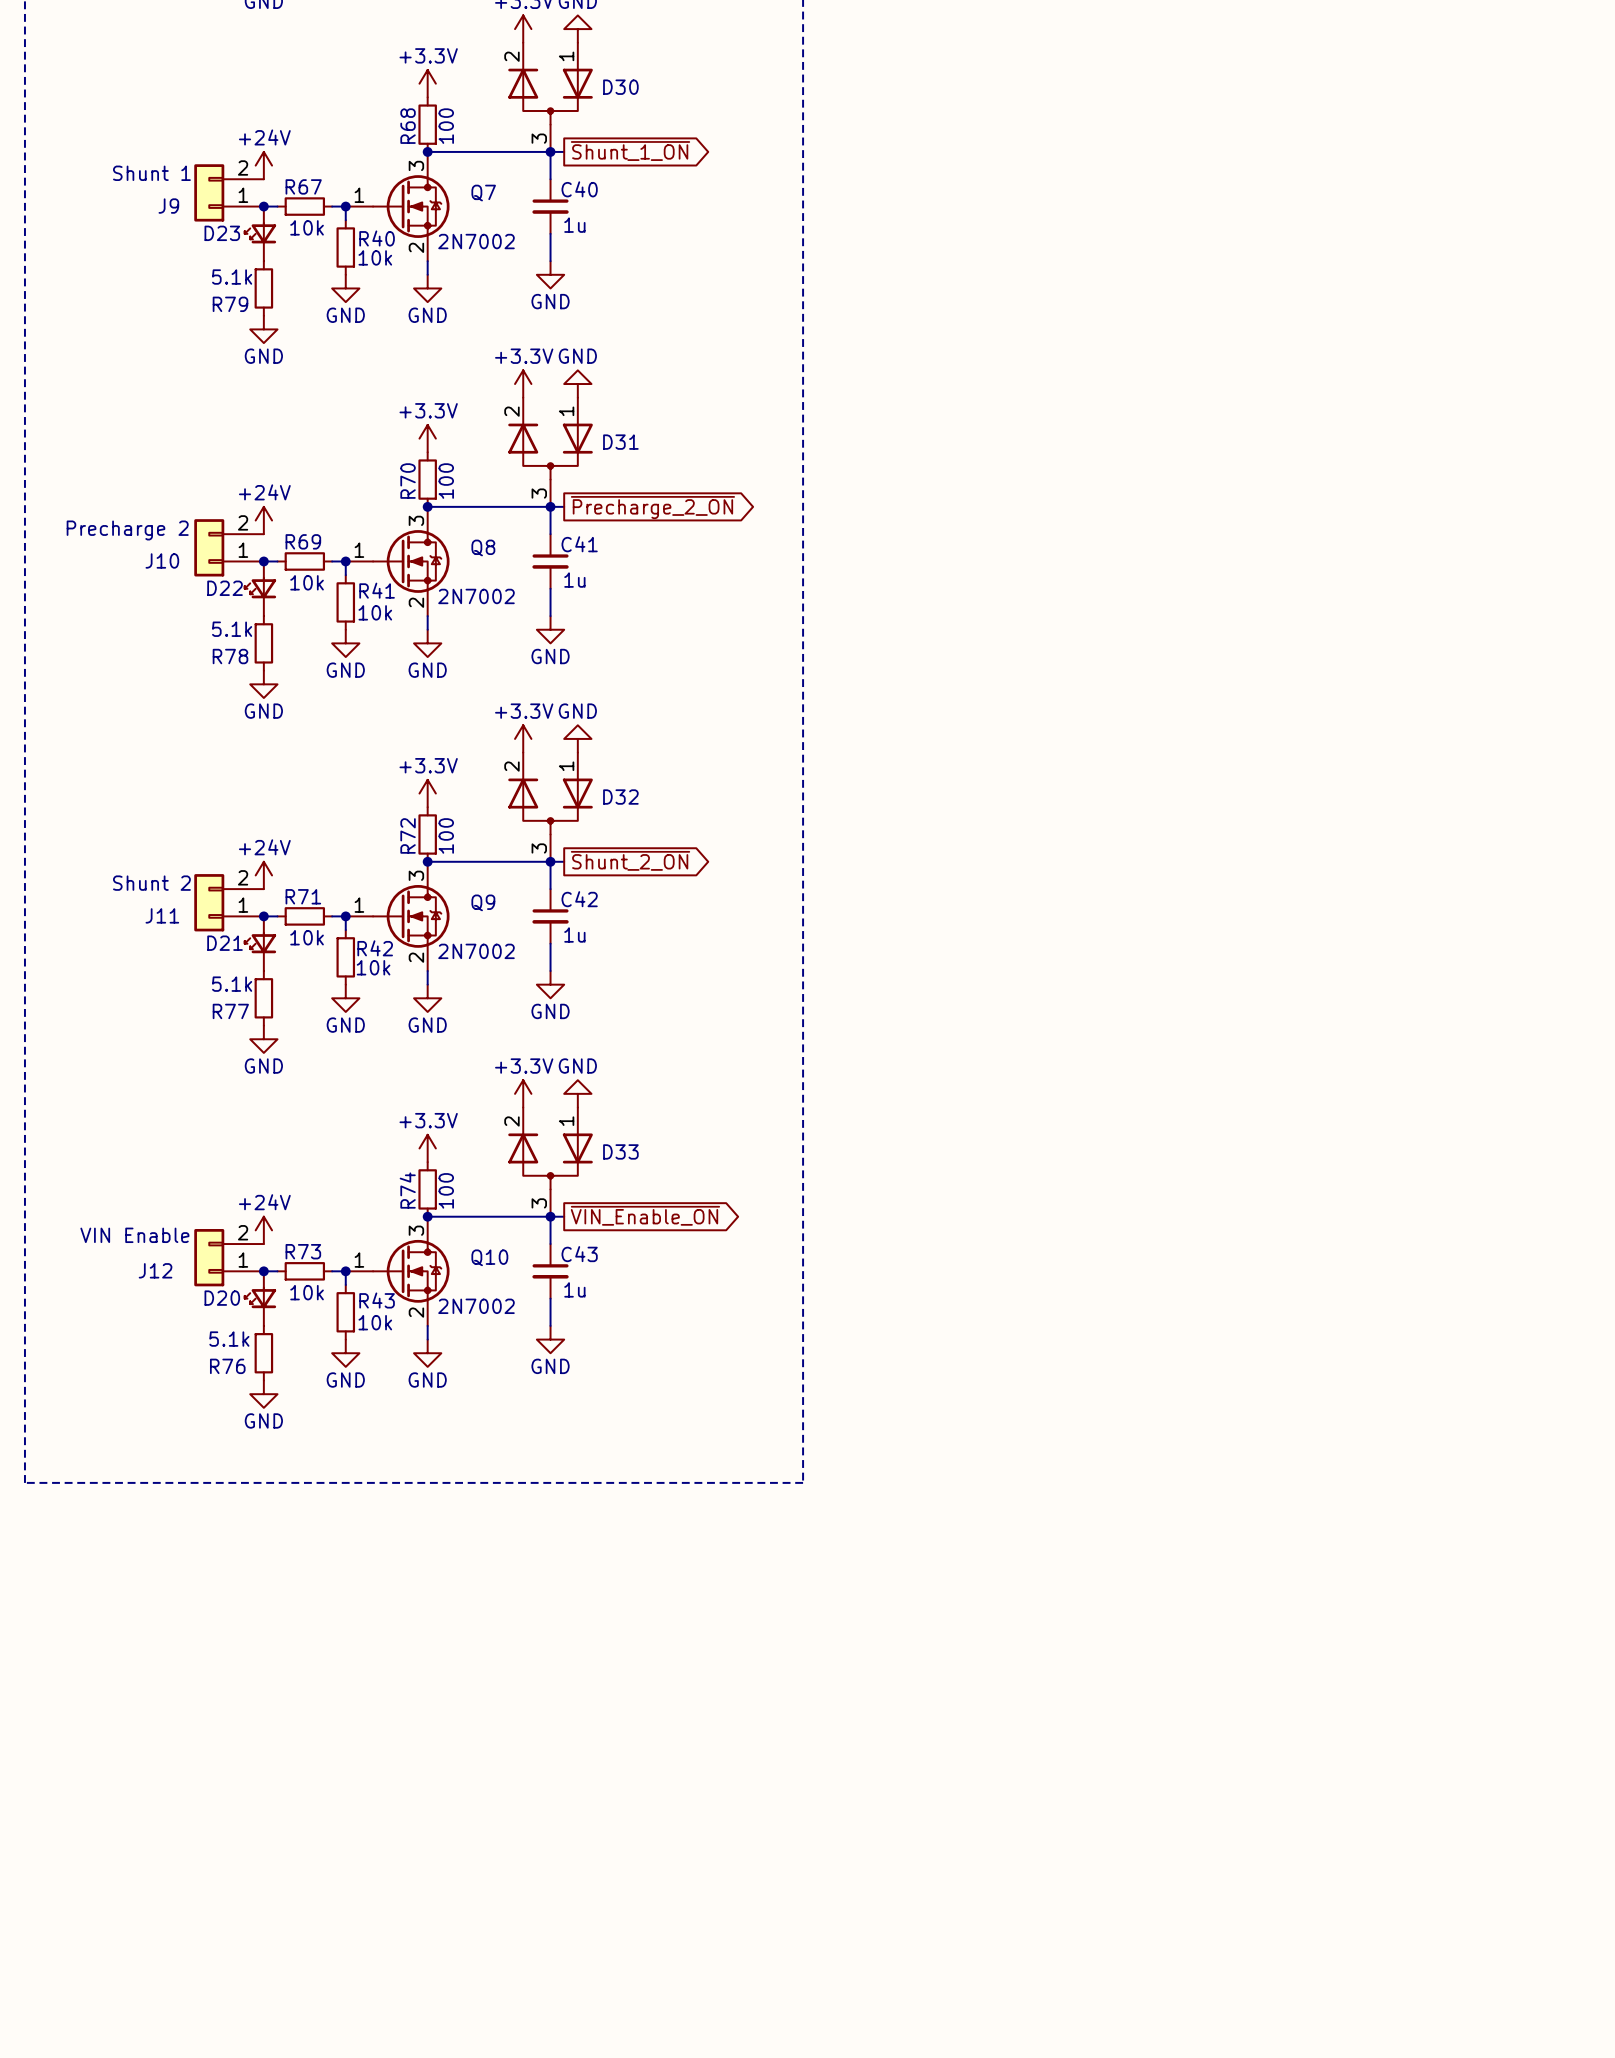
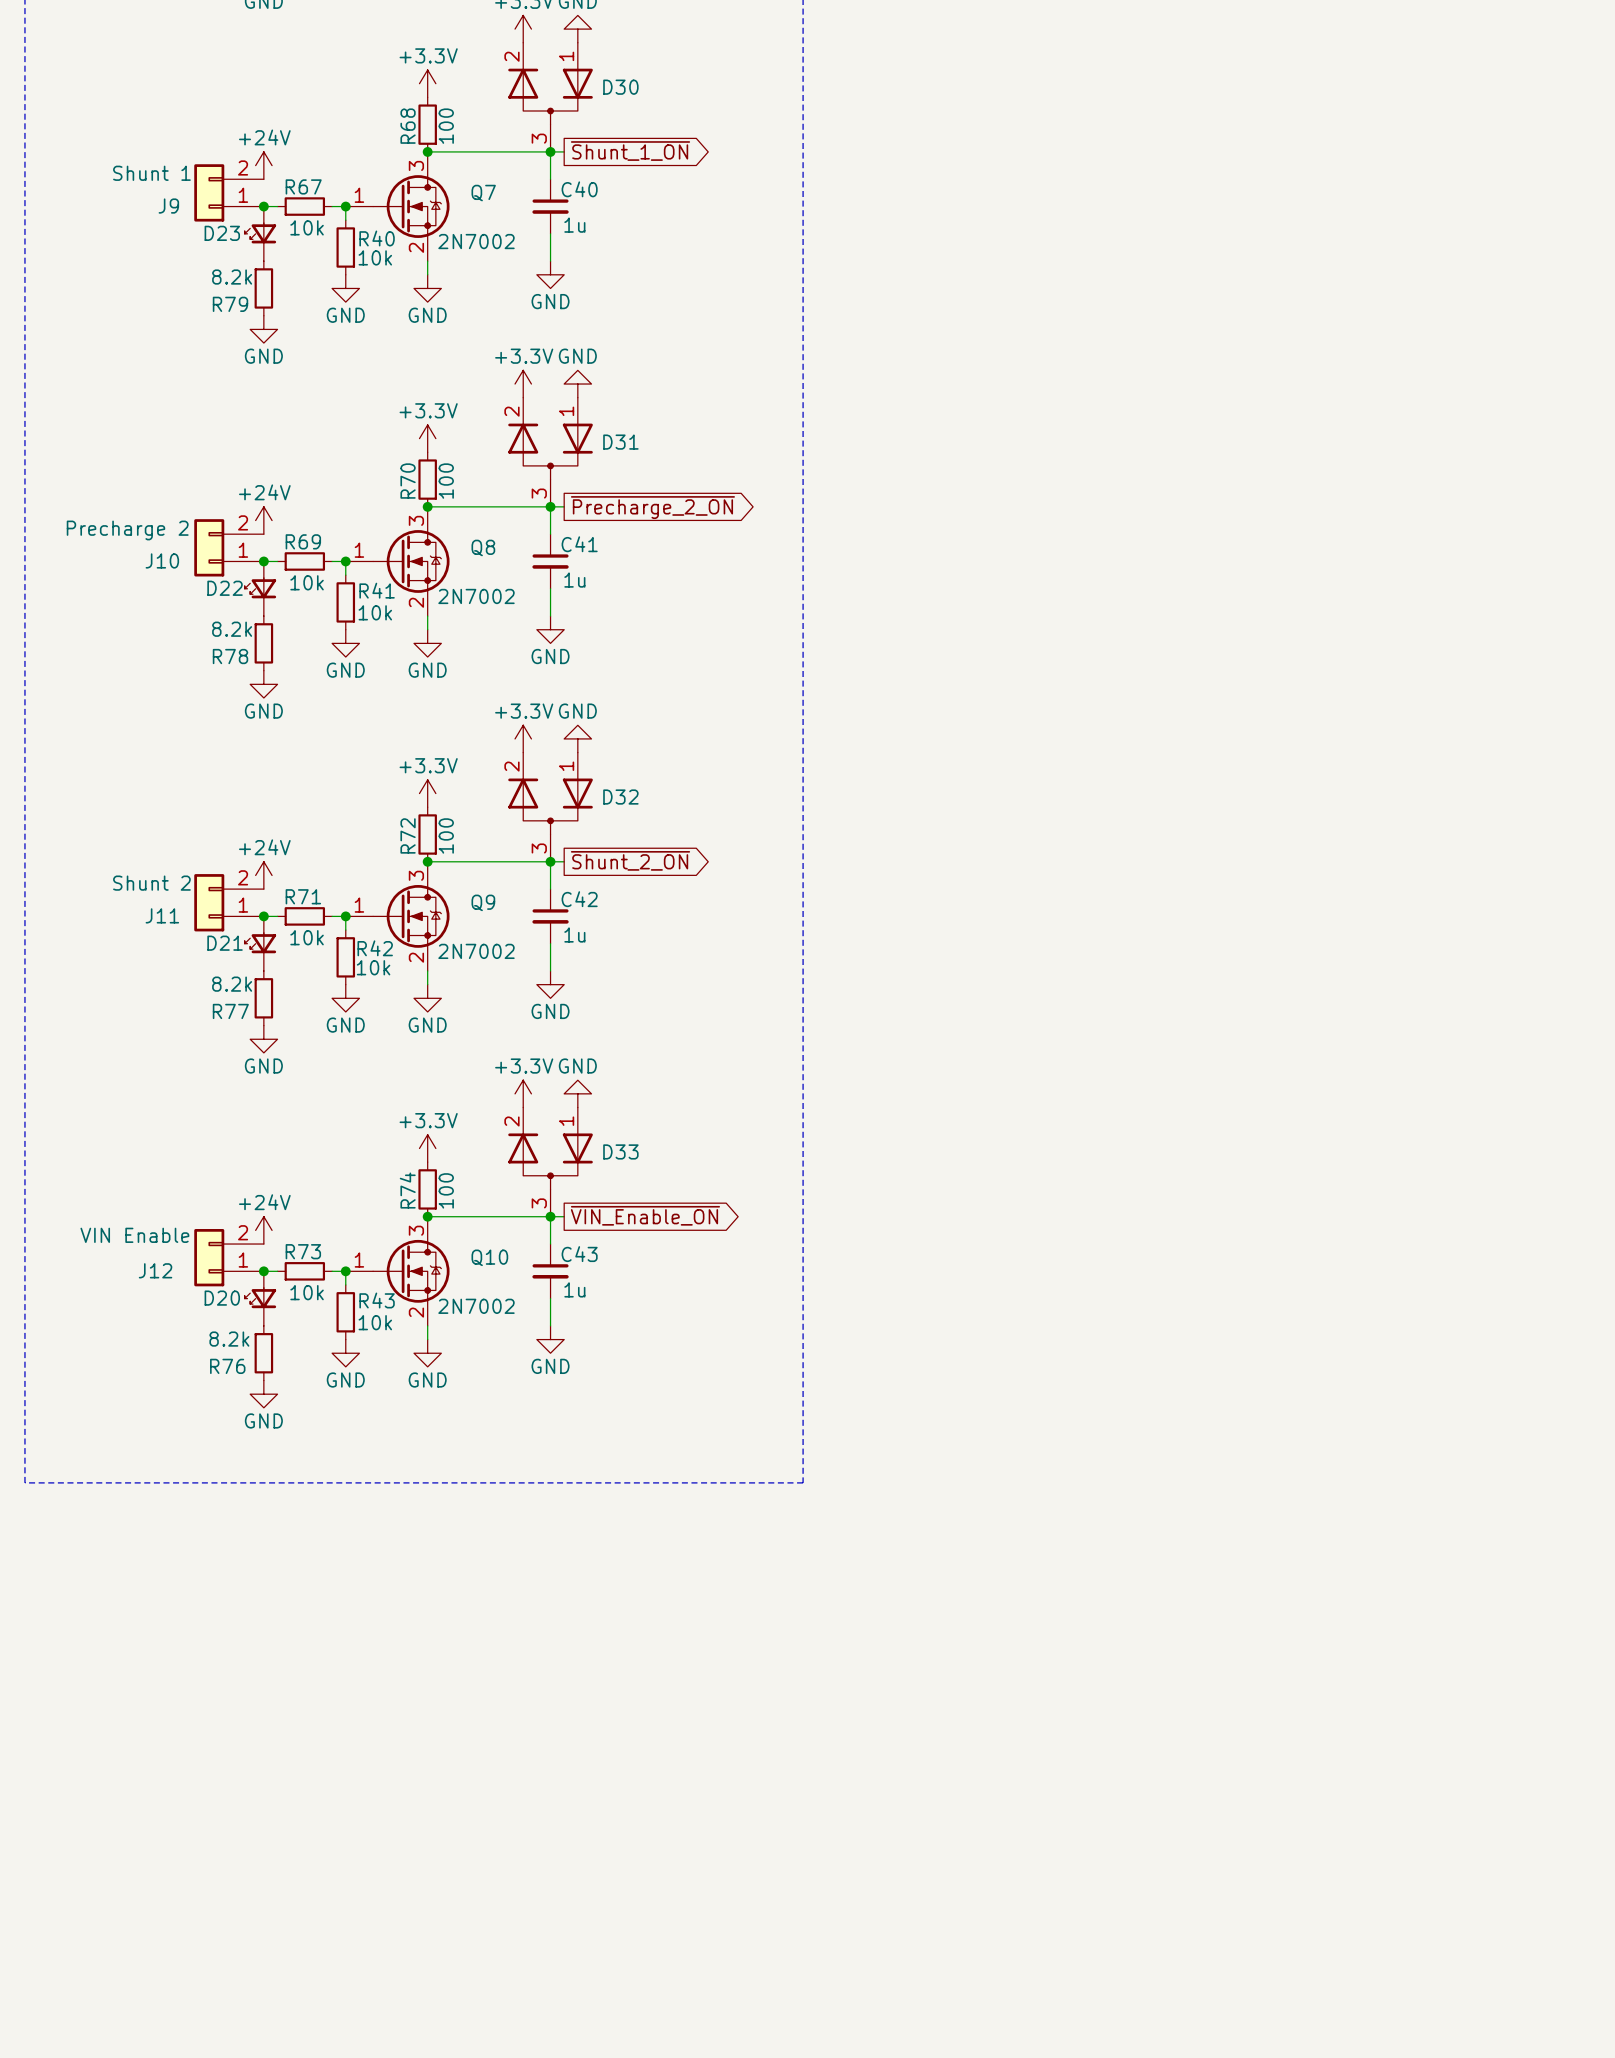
R79 value: 5.1k (232, 277) -> 8.2k (232, 277)
R78 value: 5.1k (232, 629) -> 8.2k (232, 629)
R77 value: 5.1k (232, 984) -> 8.2k (232, 984)
R76 value: 5.1k (229, 1339) -> 8.2k (229, 1339)

